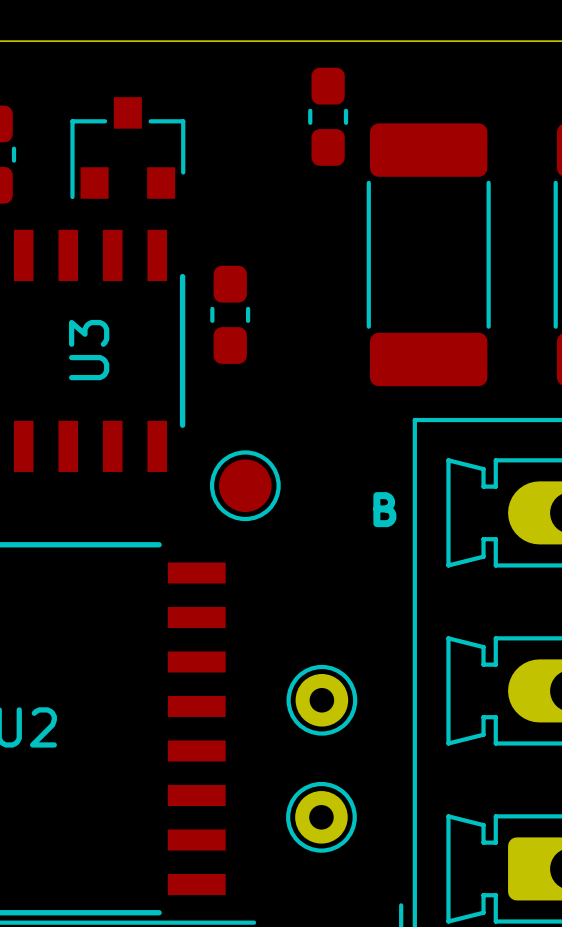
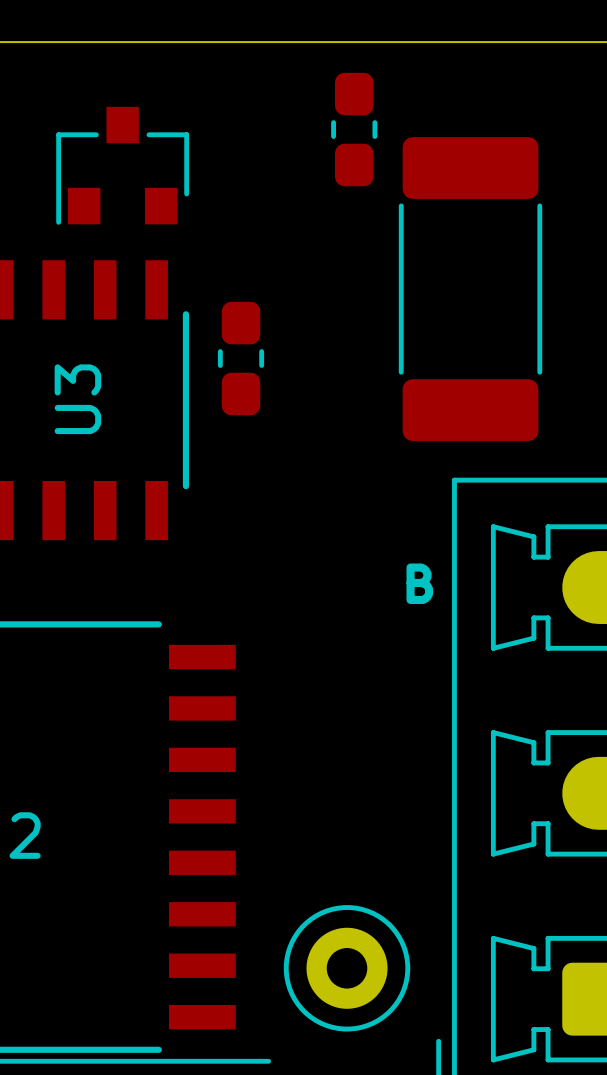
part: (245, 485) -> none
part: (321, 700) -> none
part footprint: [286, 781, 357, 853] -> [283, 905, 411, 1032]

